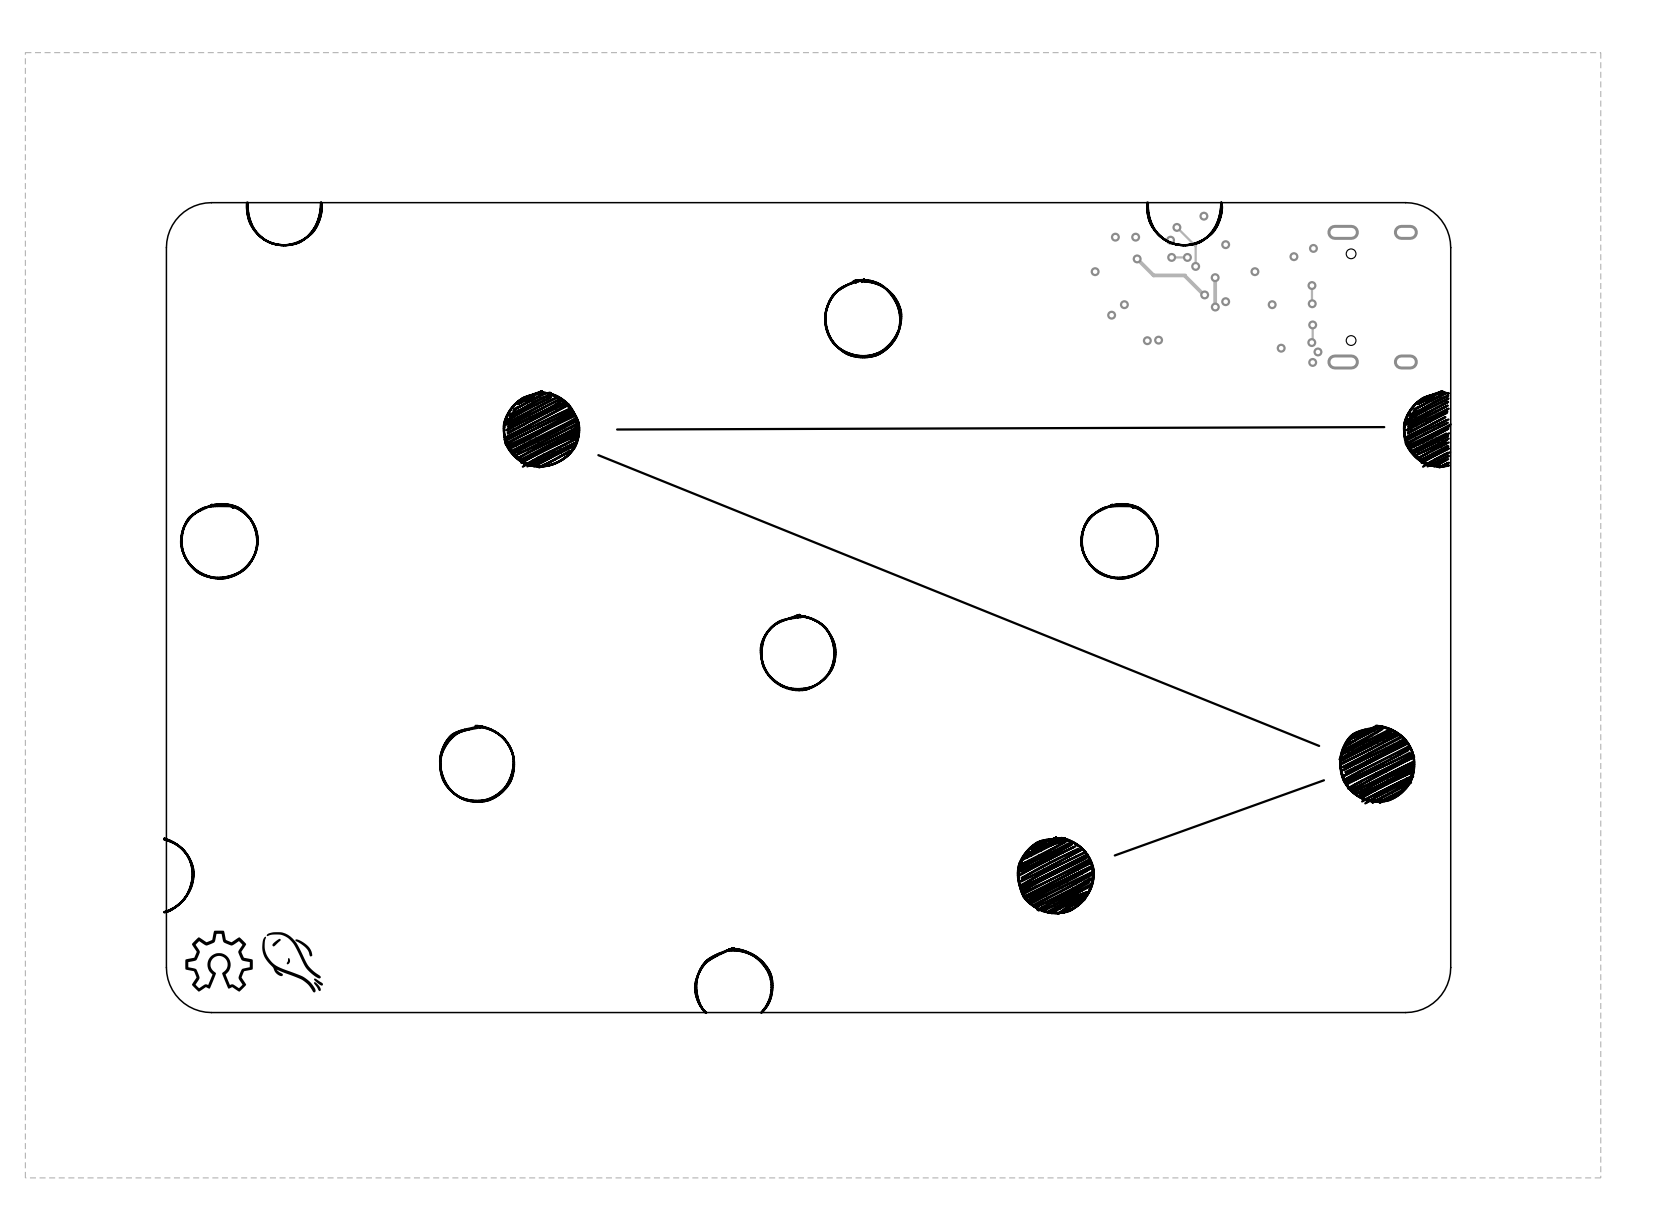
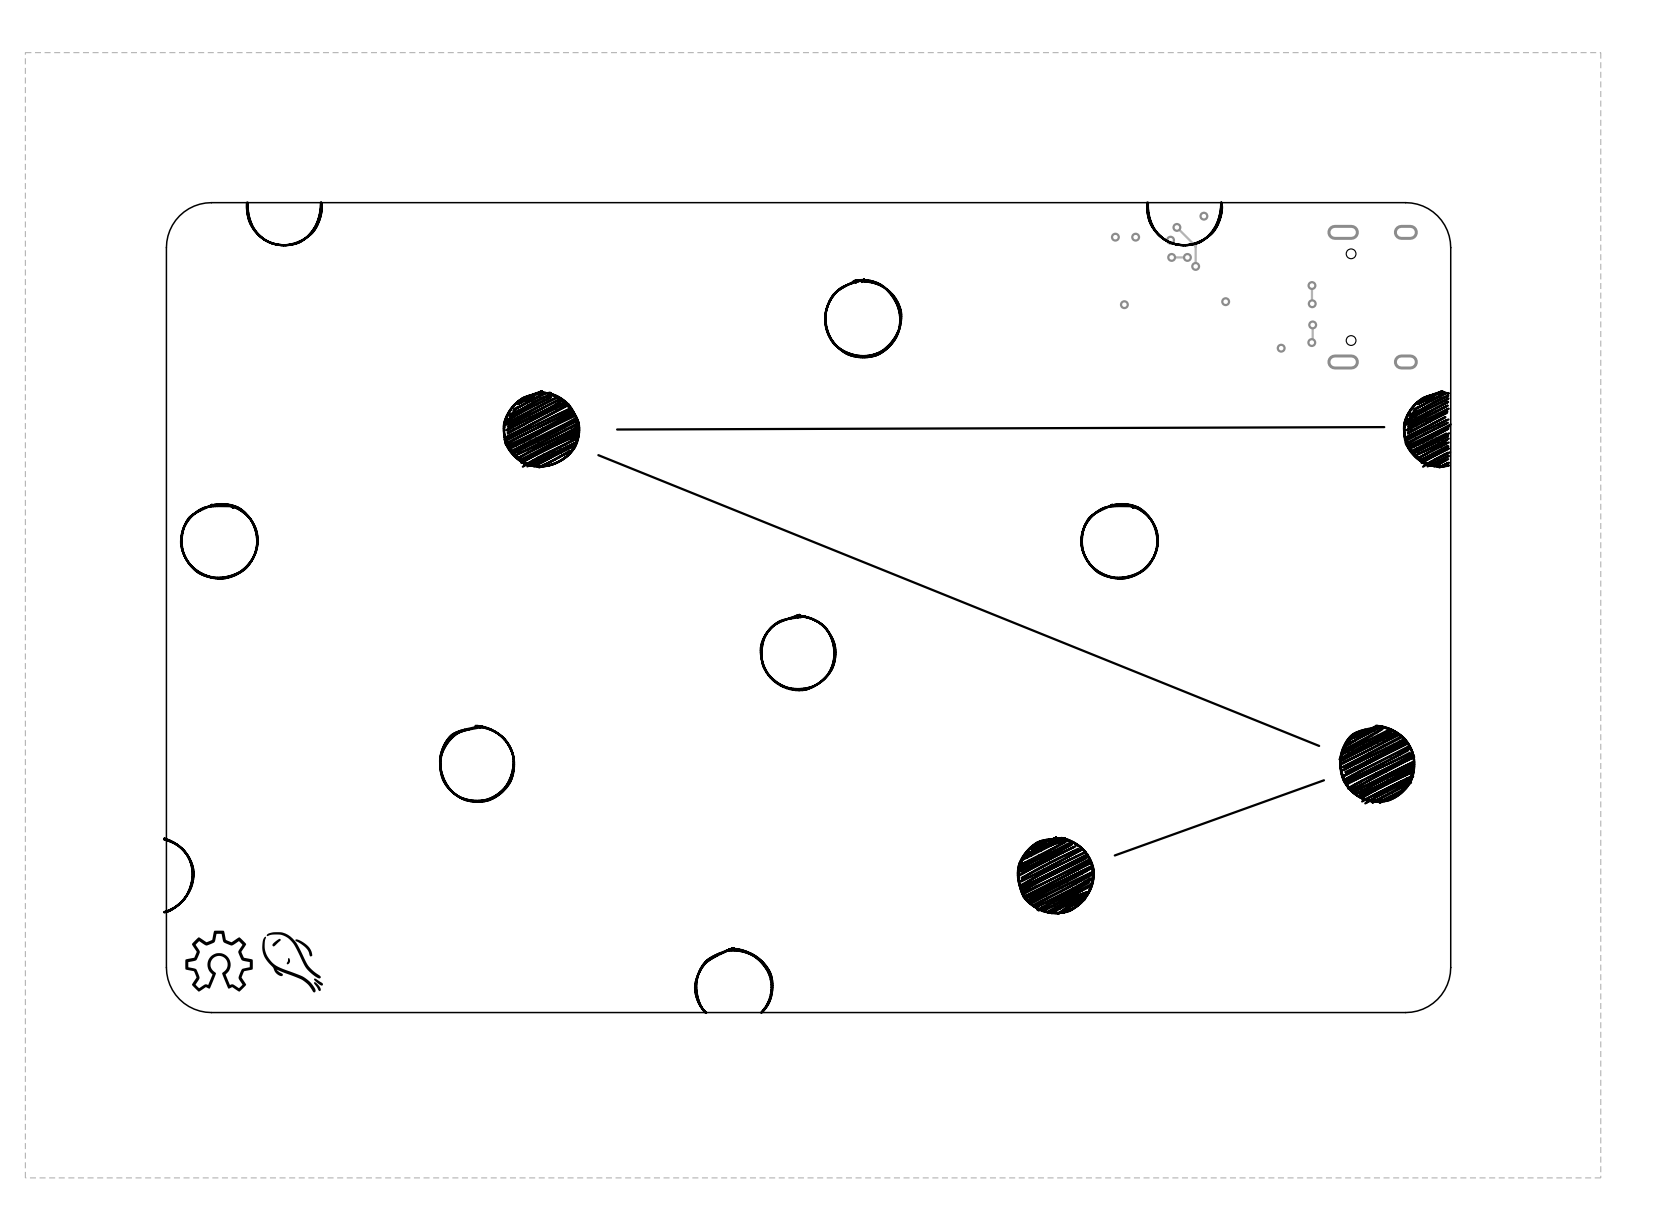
via: (1225, 244) -> none
via: (1313, 248) -> none
via: (1293, 256) -> none
track: (1137, 258) (1153, 275) (1185, 275) -> none
via: (1137, 258) -> none
via: (1095, 271) -> none
via: (1254, 271) -> none
track: (1185, 276) (1204, 295) -> none
via: (1215, 277) -> none
track: (1215, 278) (1215, 307) -> none
via: (1204, 294) -> none
via: (1272, 304) -> none
via: (1215, 307) -> none
via: (1111, 315) -> none
via: (1147, 340) -> none
via: (1158, 340) -> none
via: (1317, 351) -> none
via: (1312, 362) -> none

